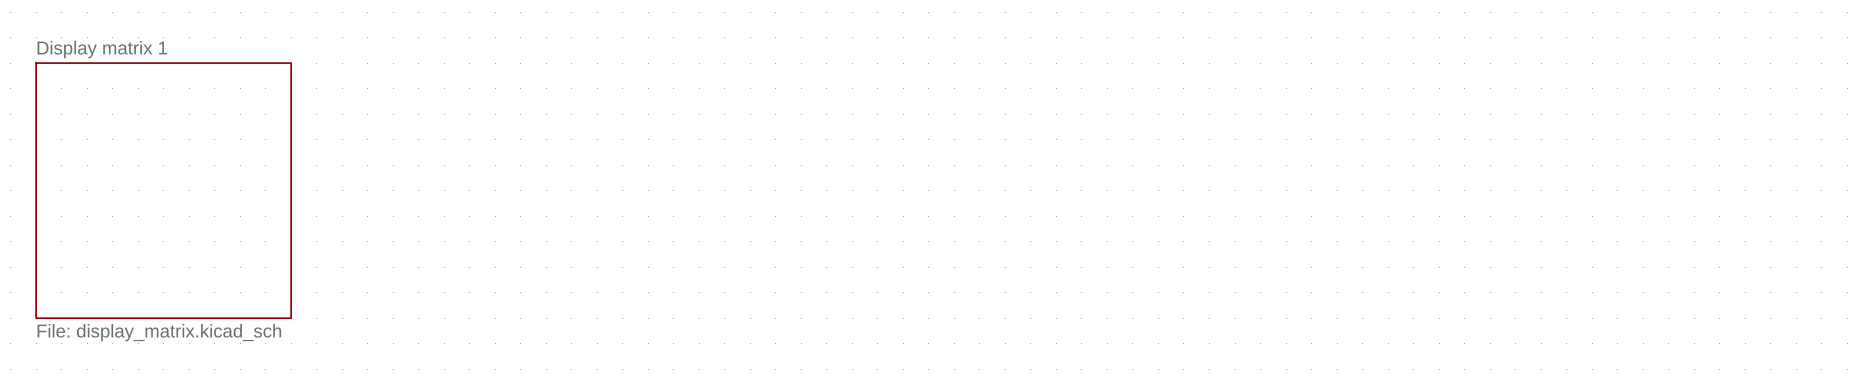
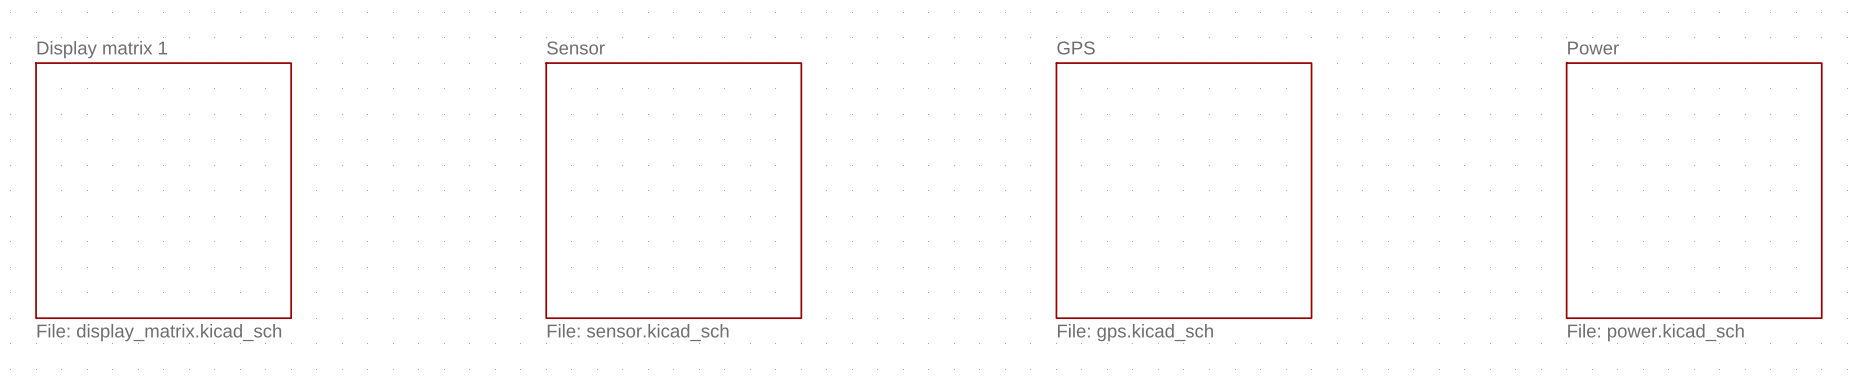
sheet Sensor: none -> File: sensor.kicad_sch (673, 190)
sheet GPS: none -> File: gps.kicad_sch (1183, 190)
sheet Power: none -> File: power.kicad_sch (1694, 190)

